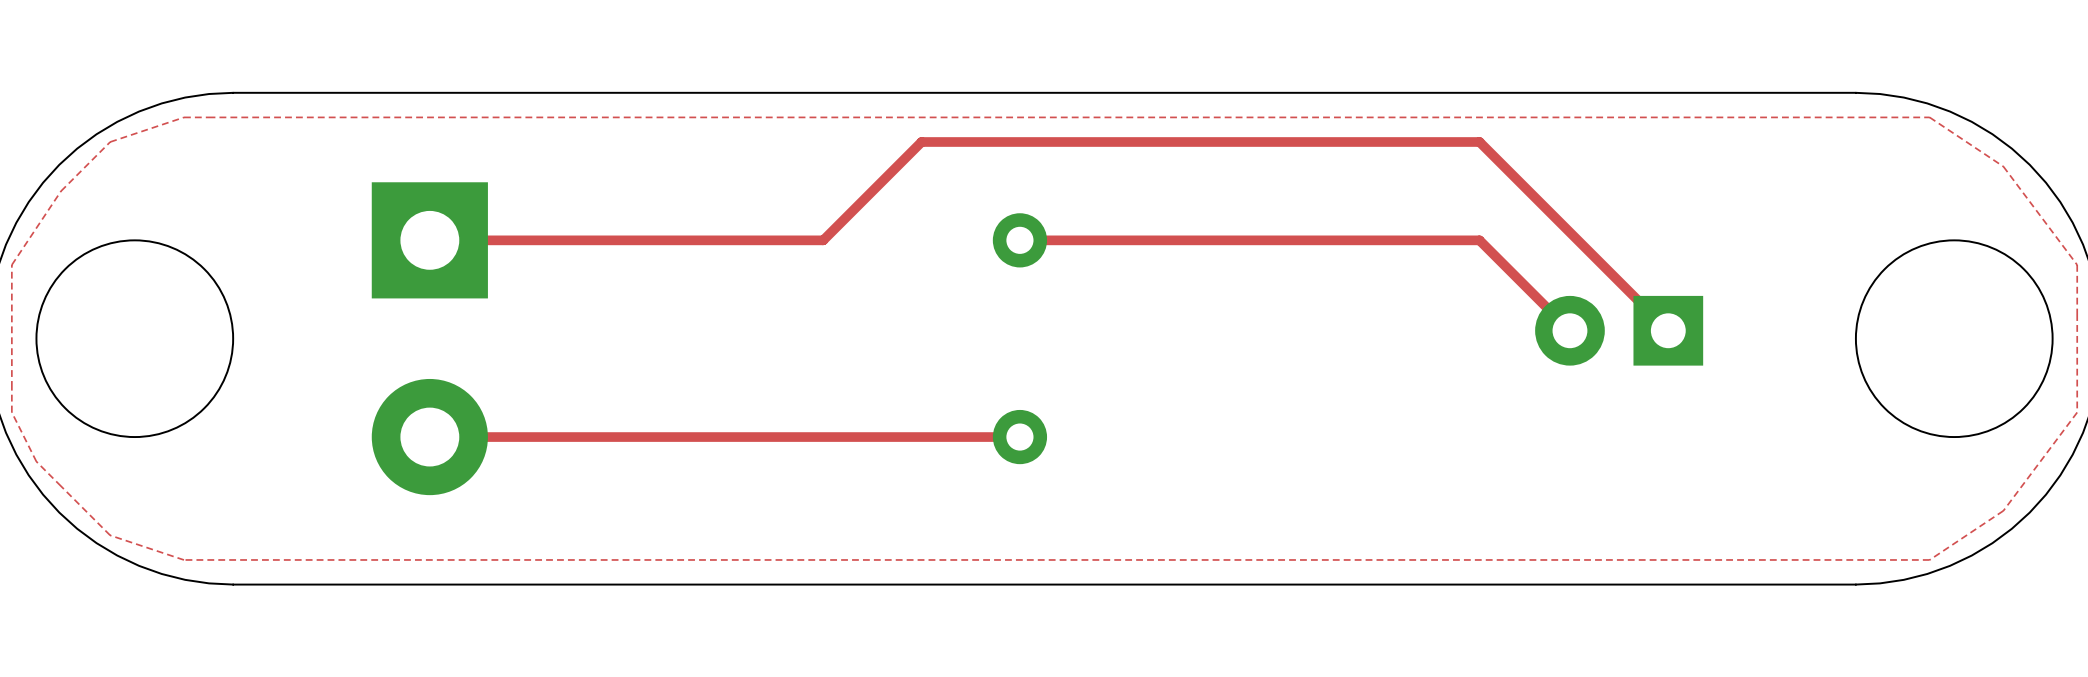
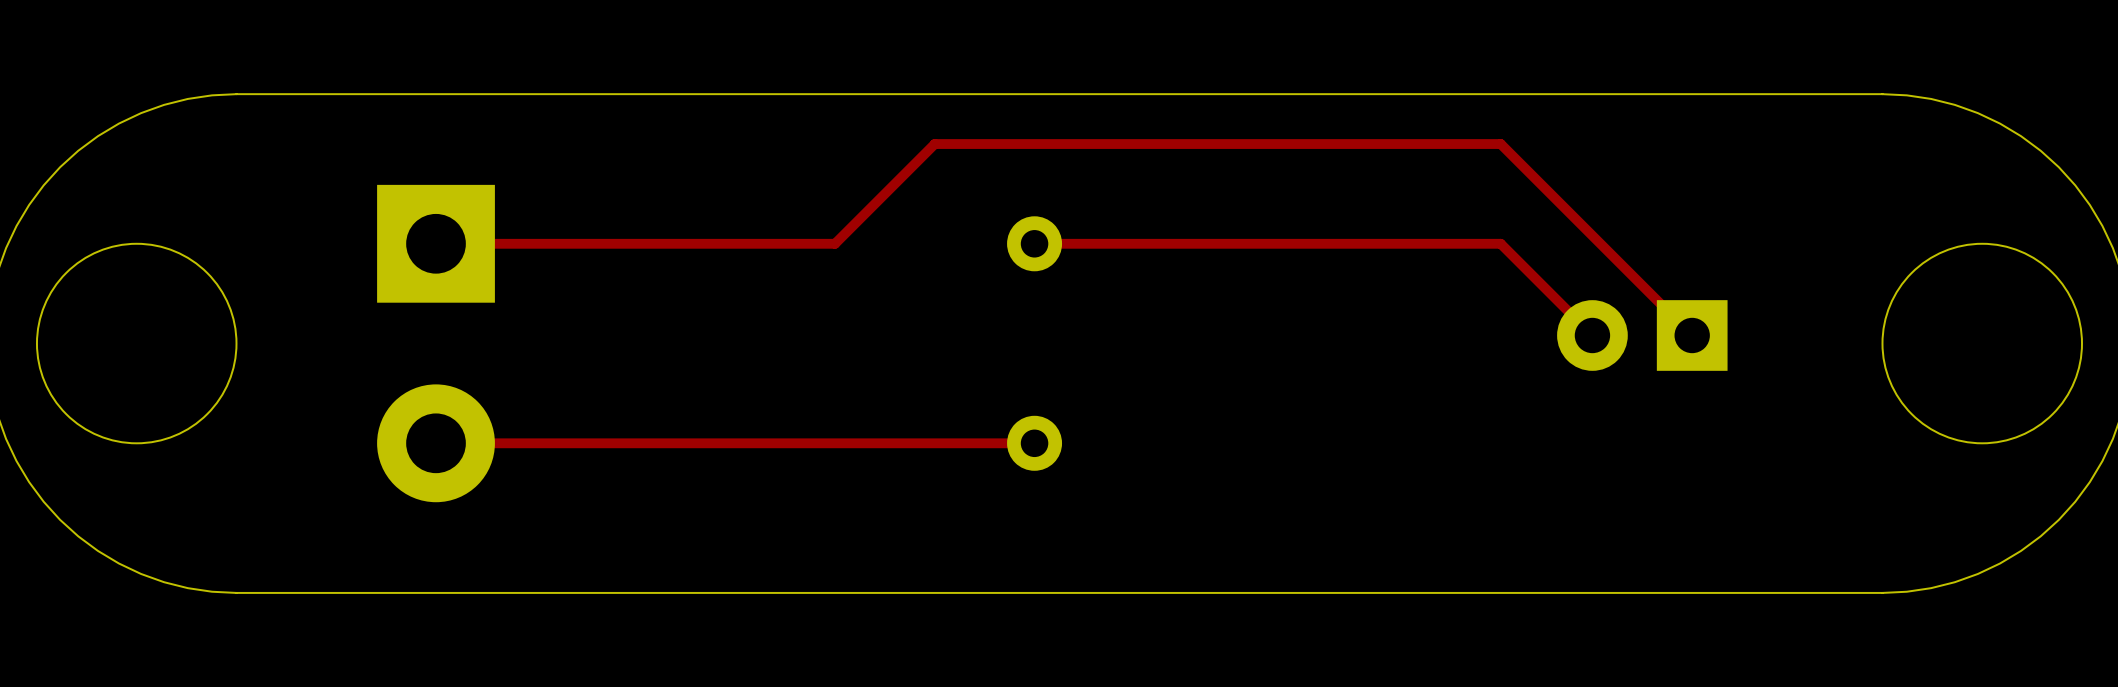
top zone outline: (1929, 117) (183, 117) (110, 142) (61, 191) (11, 264) (11, 412) (36, 461) (110, 535) (183, 559) (1929, 559) (2003, 510) (2077, 412) (2077, 264) (2003, 166) (1929, 117) -> none

